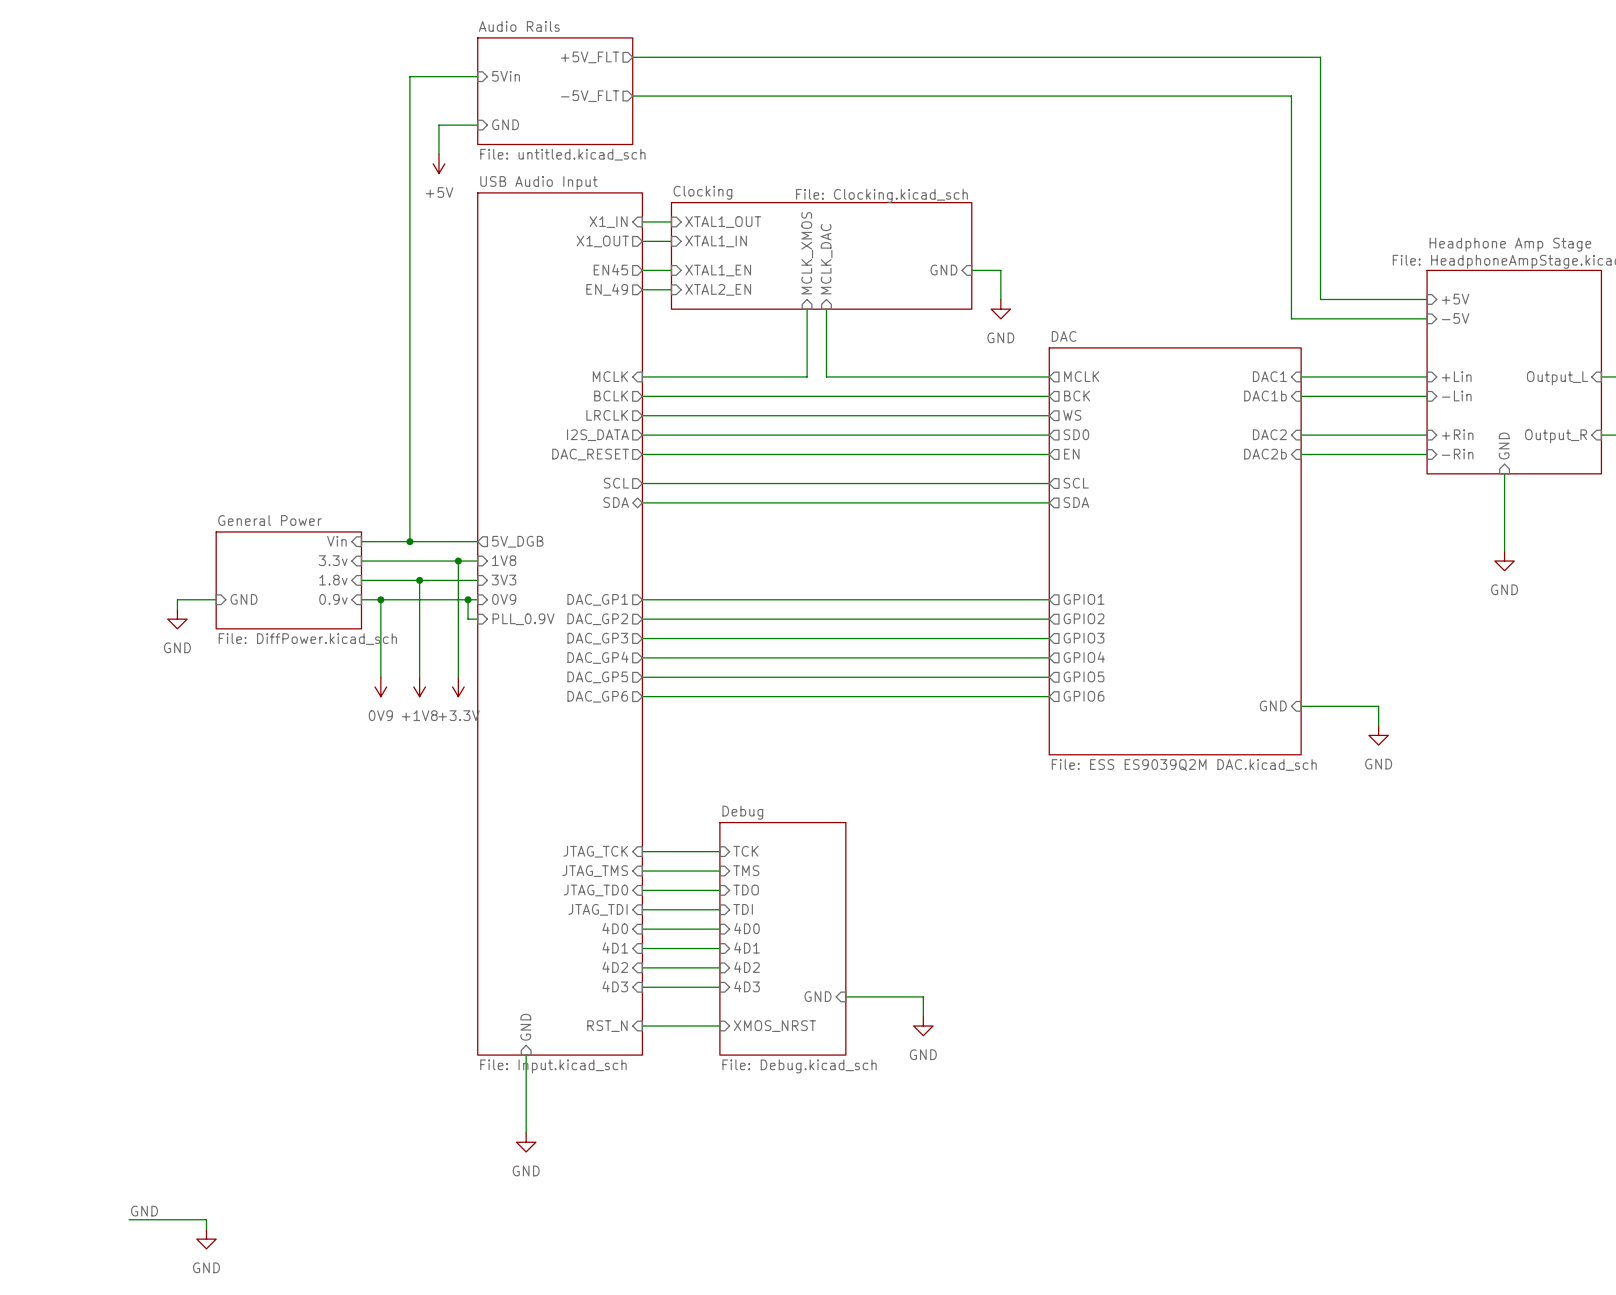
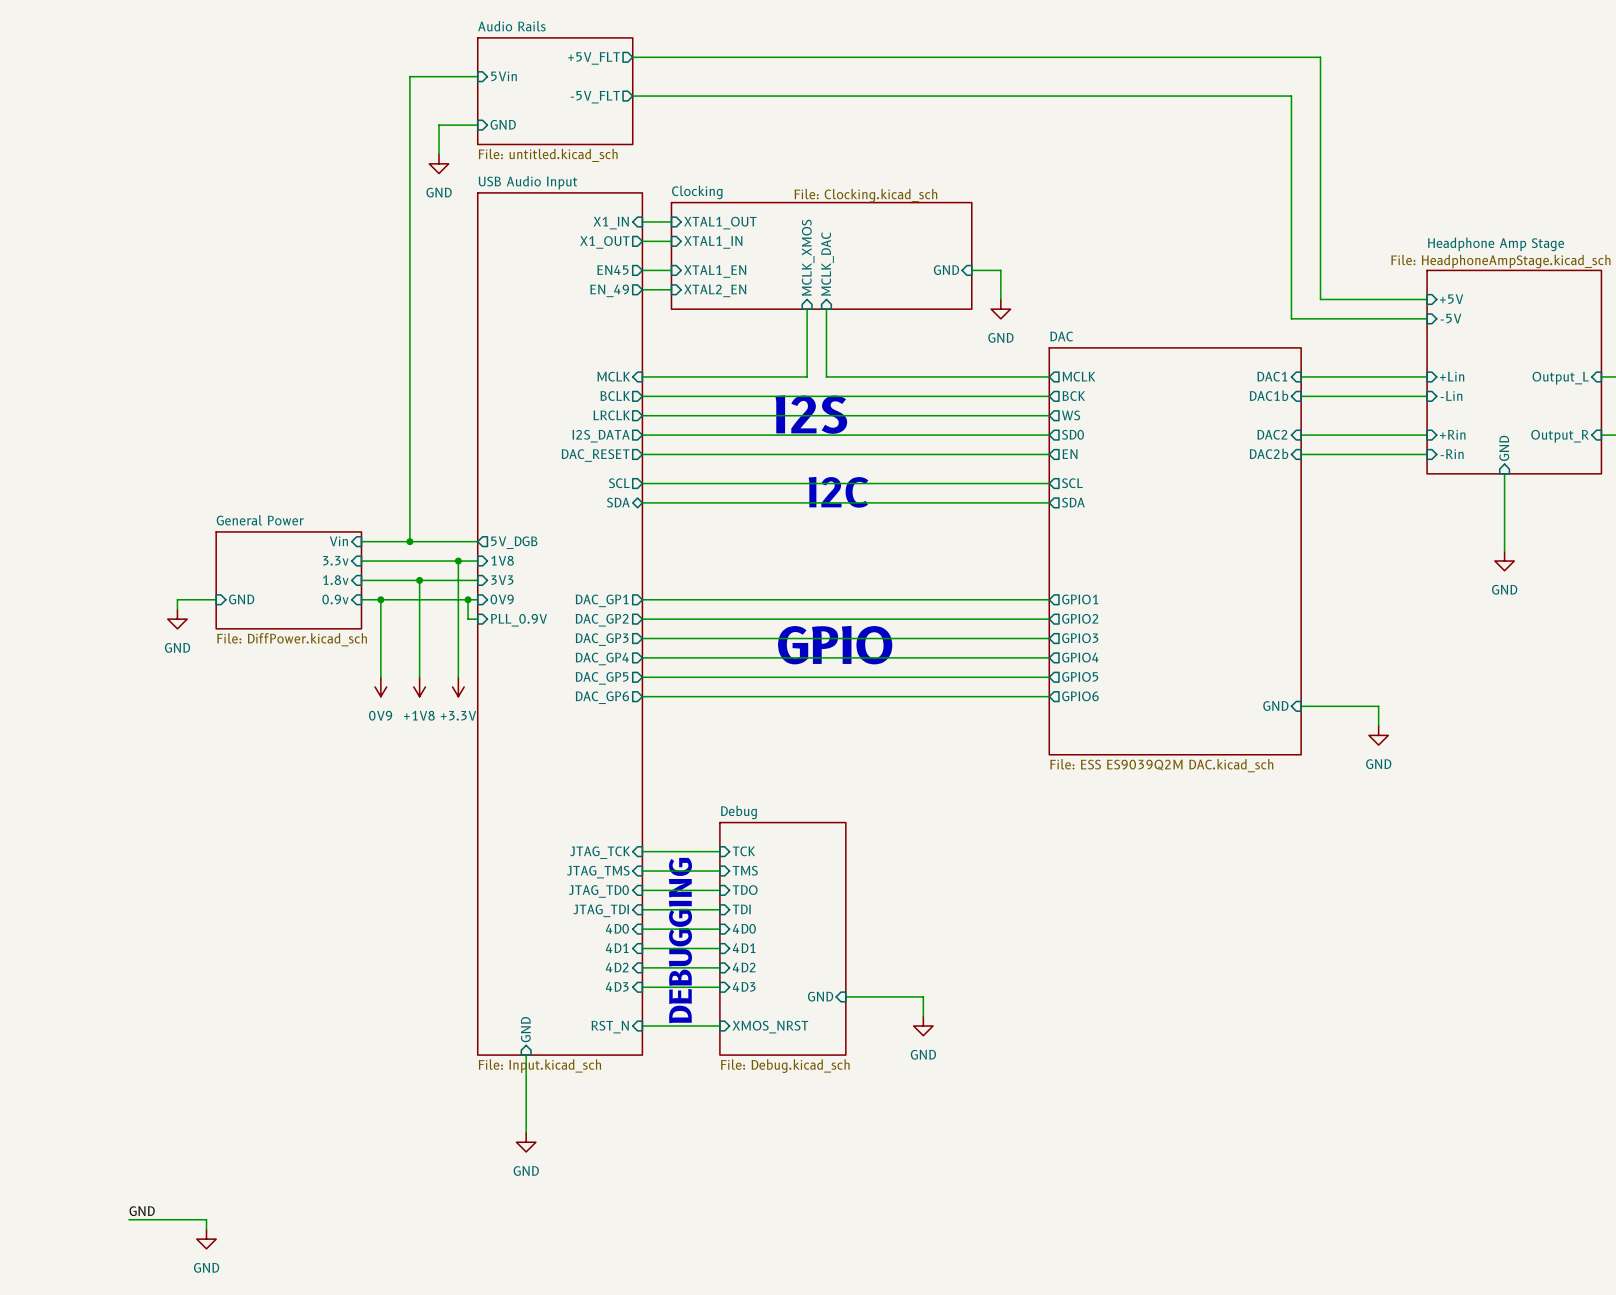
power symbol: +5V (438, 163) -> GND (438, 163)
text: none -> I2S (811, 414)
text: none -> I2C (838, 492)
text: none -> GPIO (835, 645)
text: none -> DEBUGGING (680, 940)

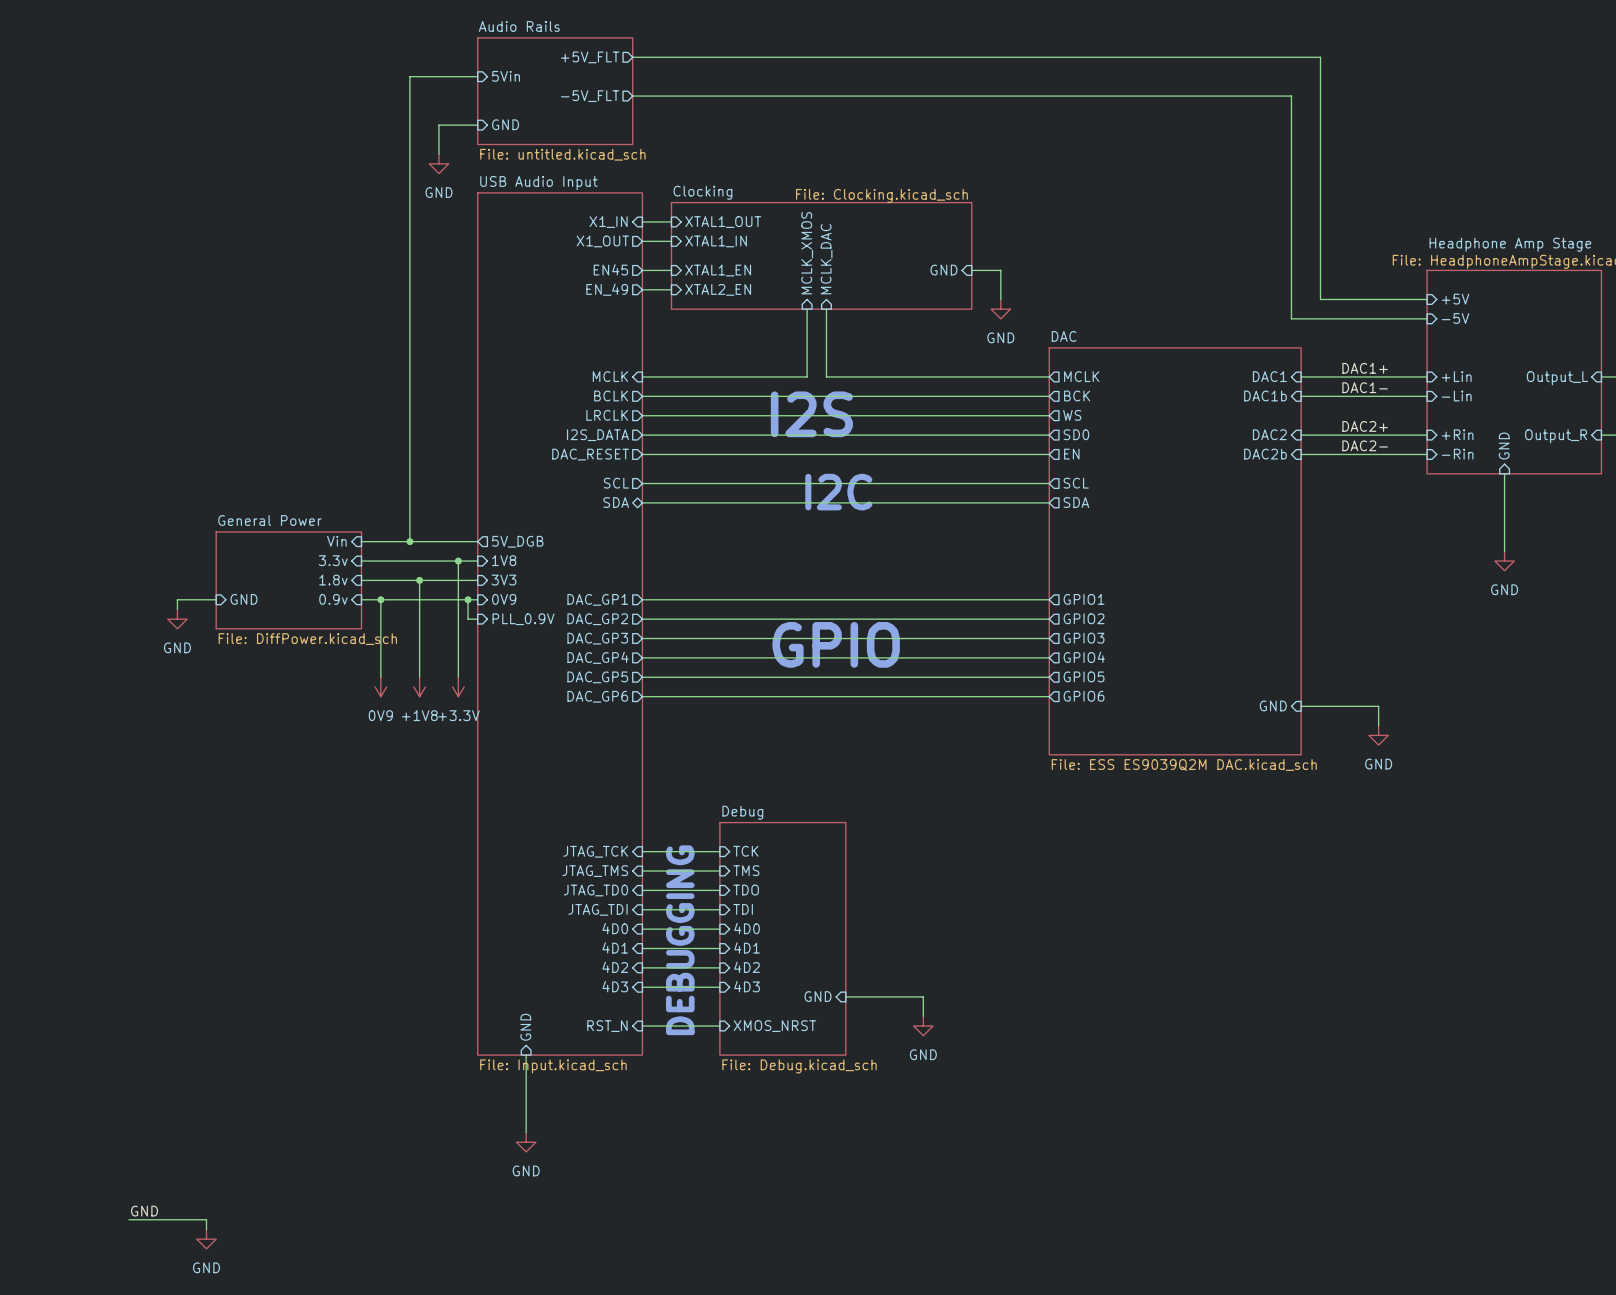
label: none -> DAC1+ (1365, 368)
label: none -> DAC1- (1365, 387)
label: none -> DAC2+ (1365, 426)
label: none -> DAC2- (1365, 445)

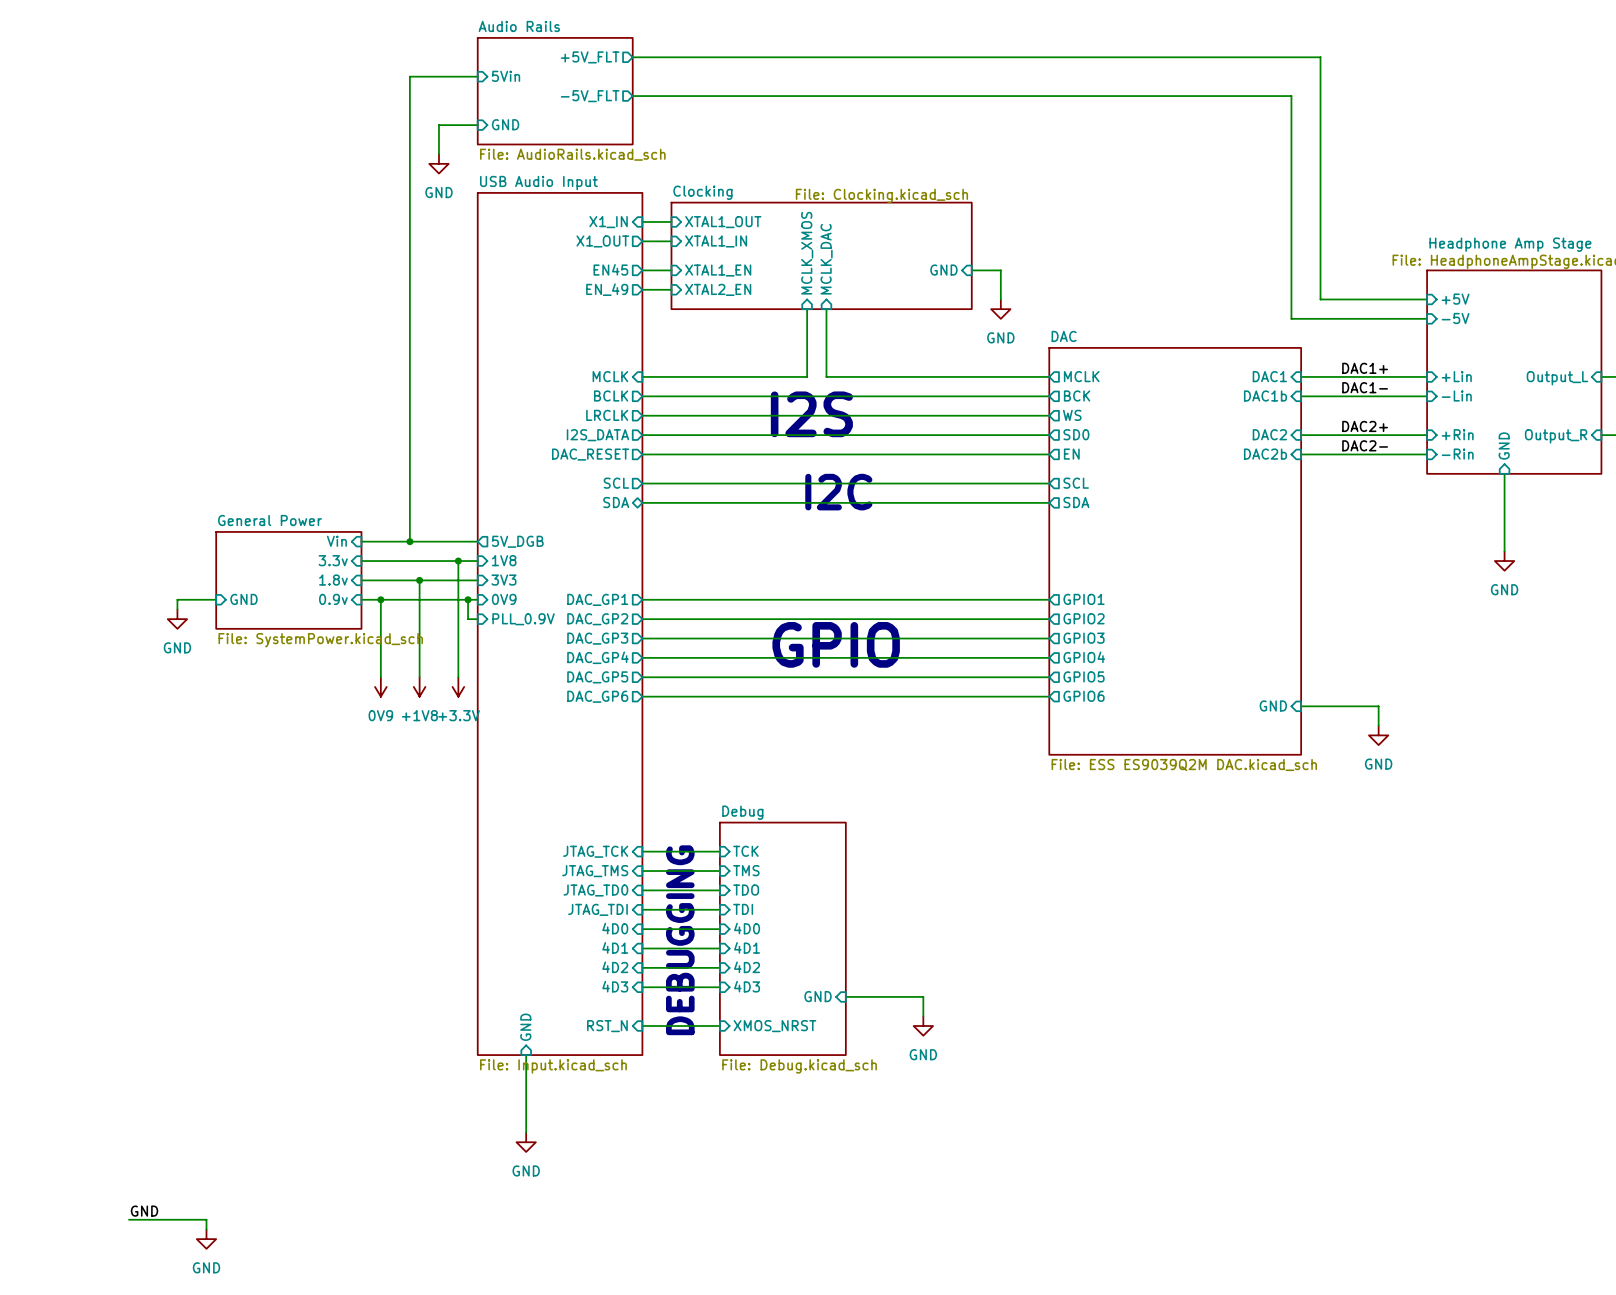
sheet Audio Rails value: File: untitled.kicad_sch (562, 154) -> File: AudioRails.kicad_sch (572, 154)
sheet General Power value: File: DiffPower.kicad_sch (307, 639) -> File: SystemPower.kicad_sch (320, 640)

